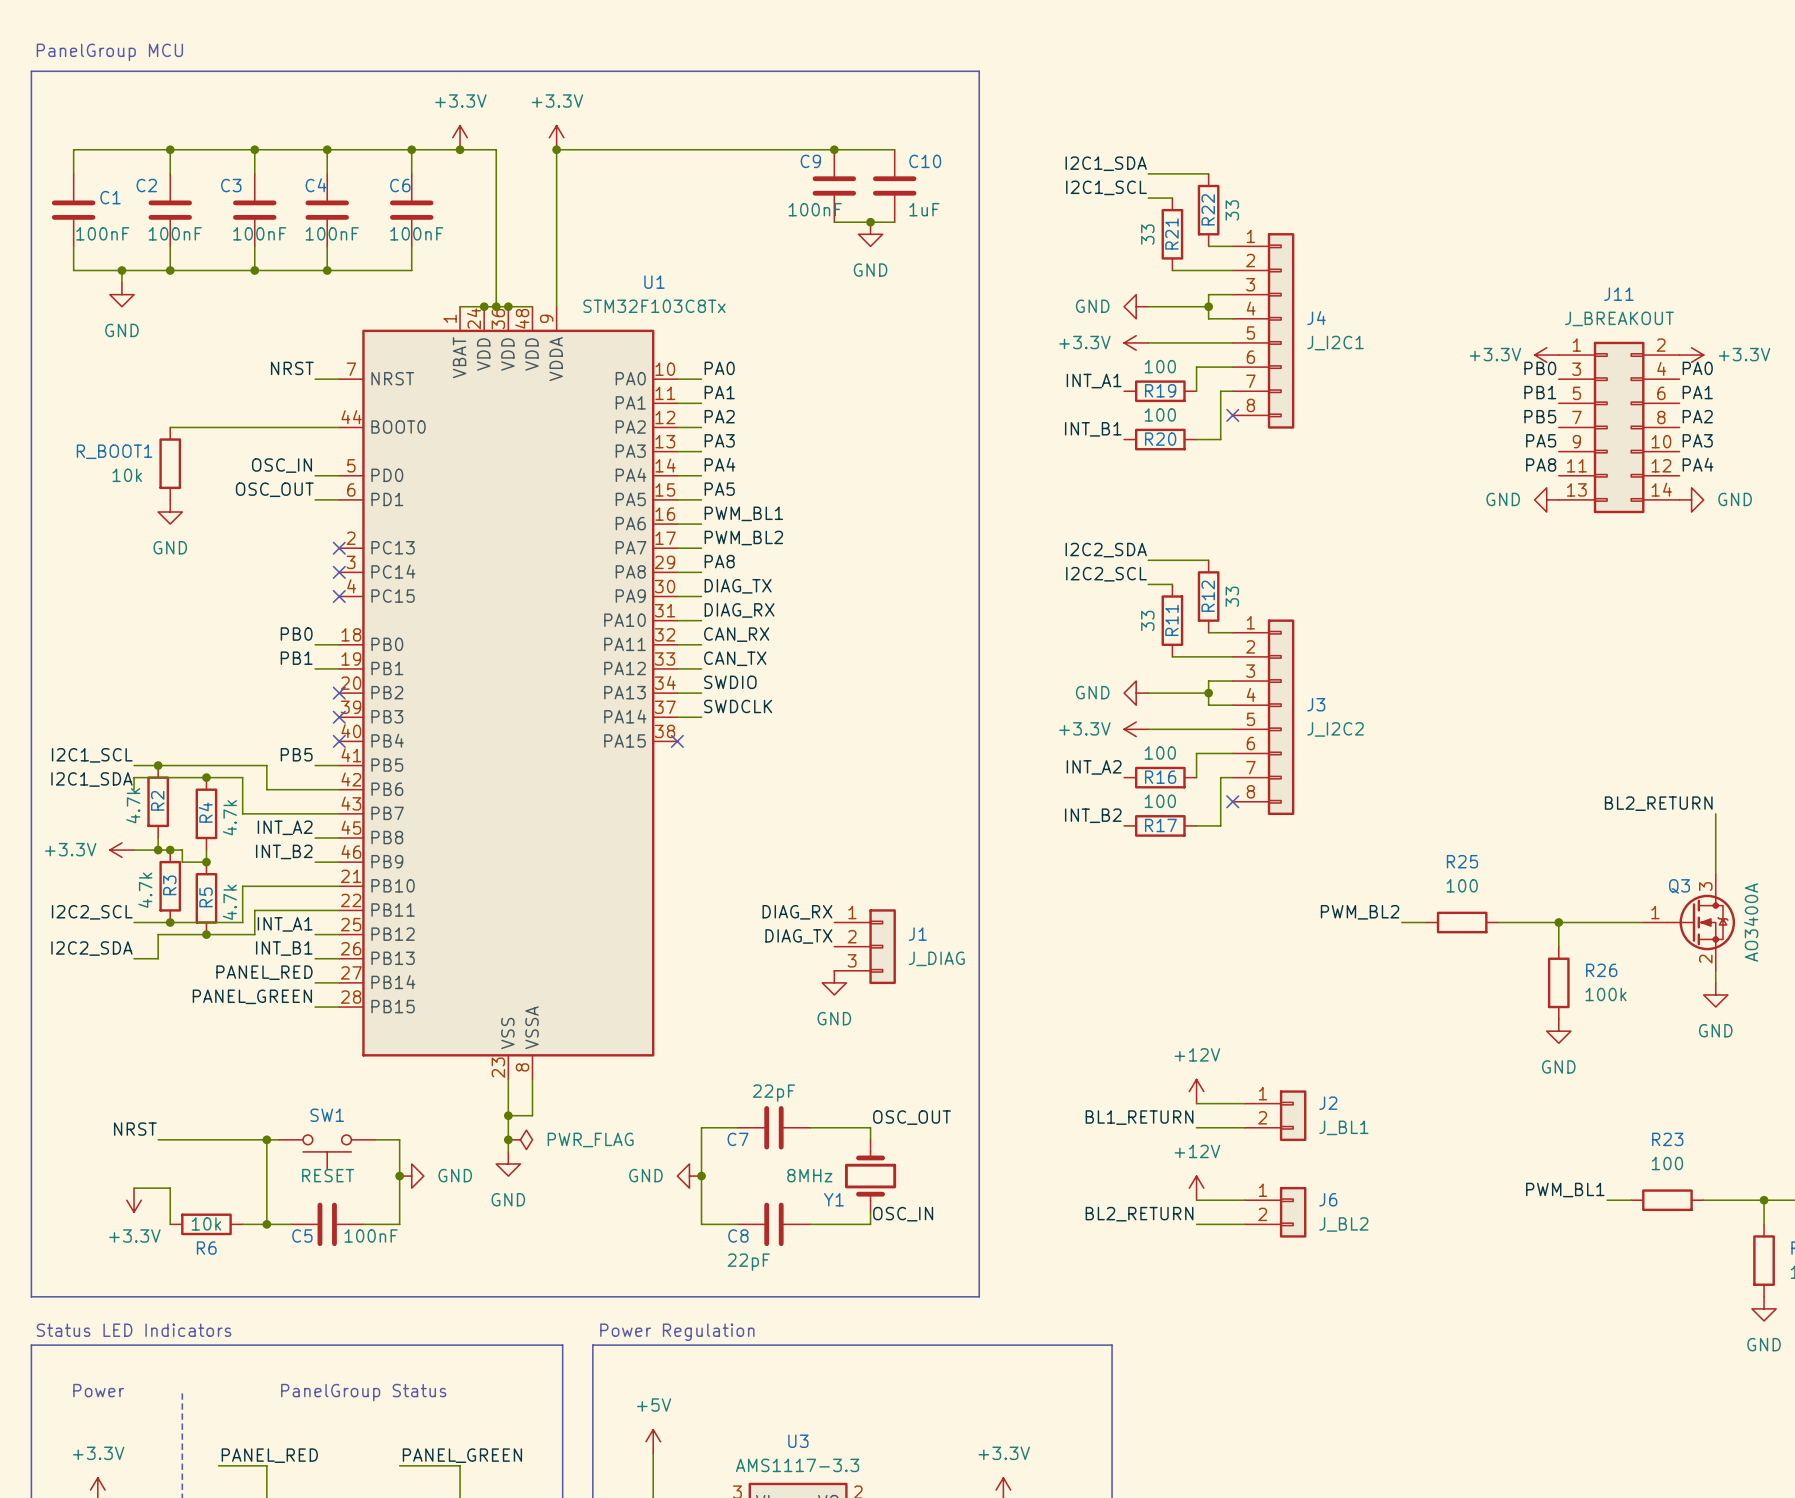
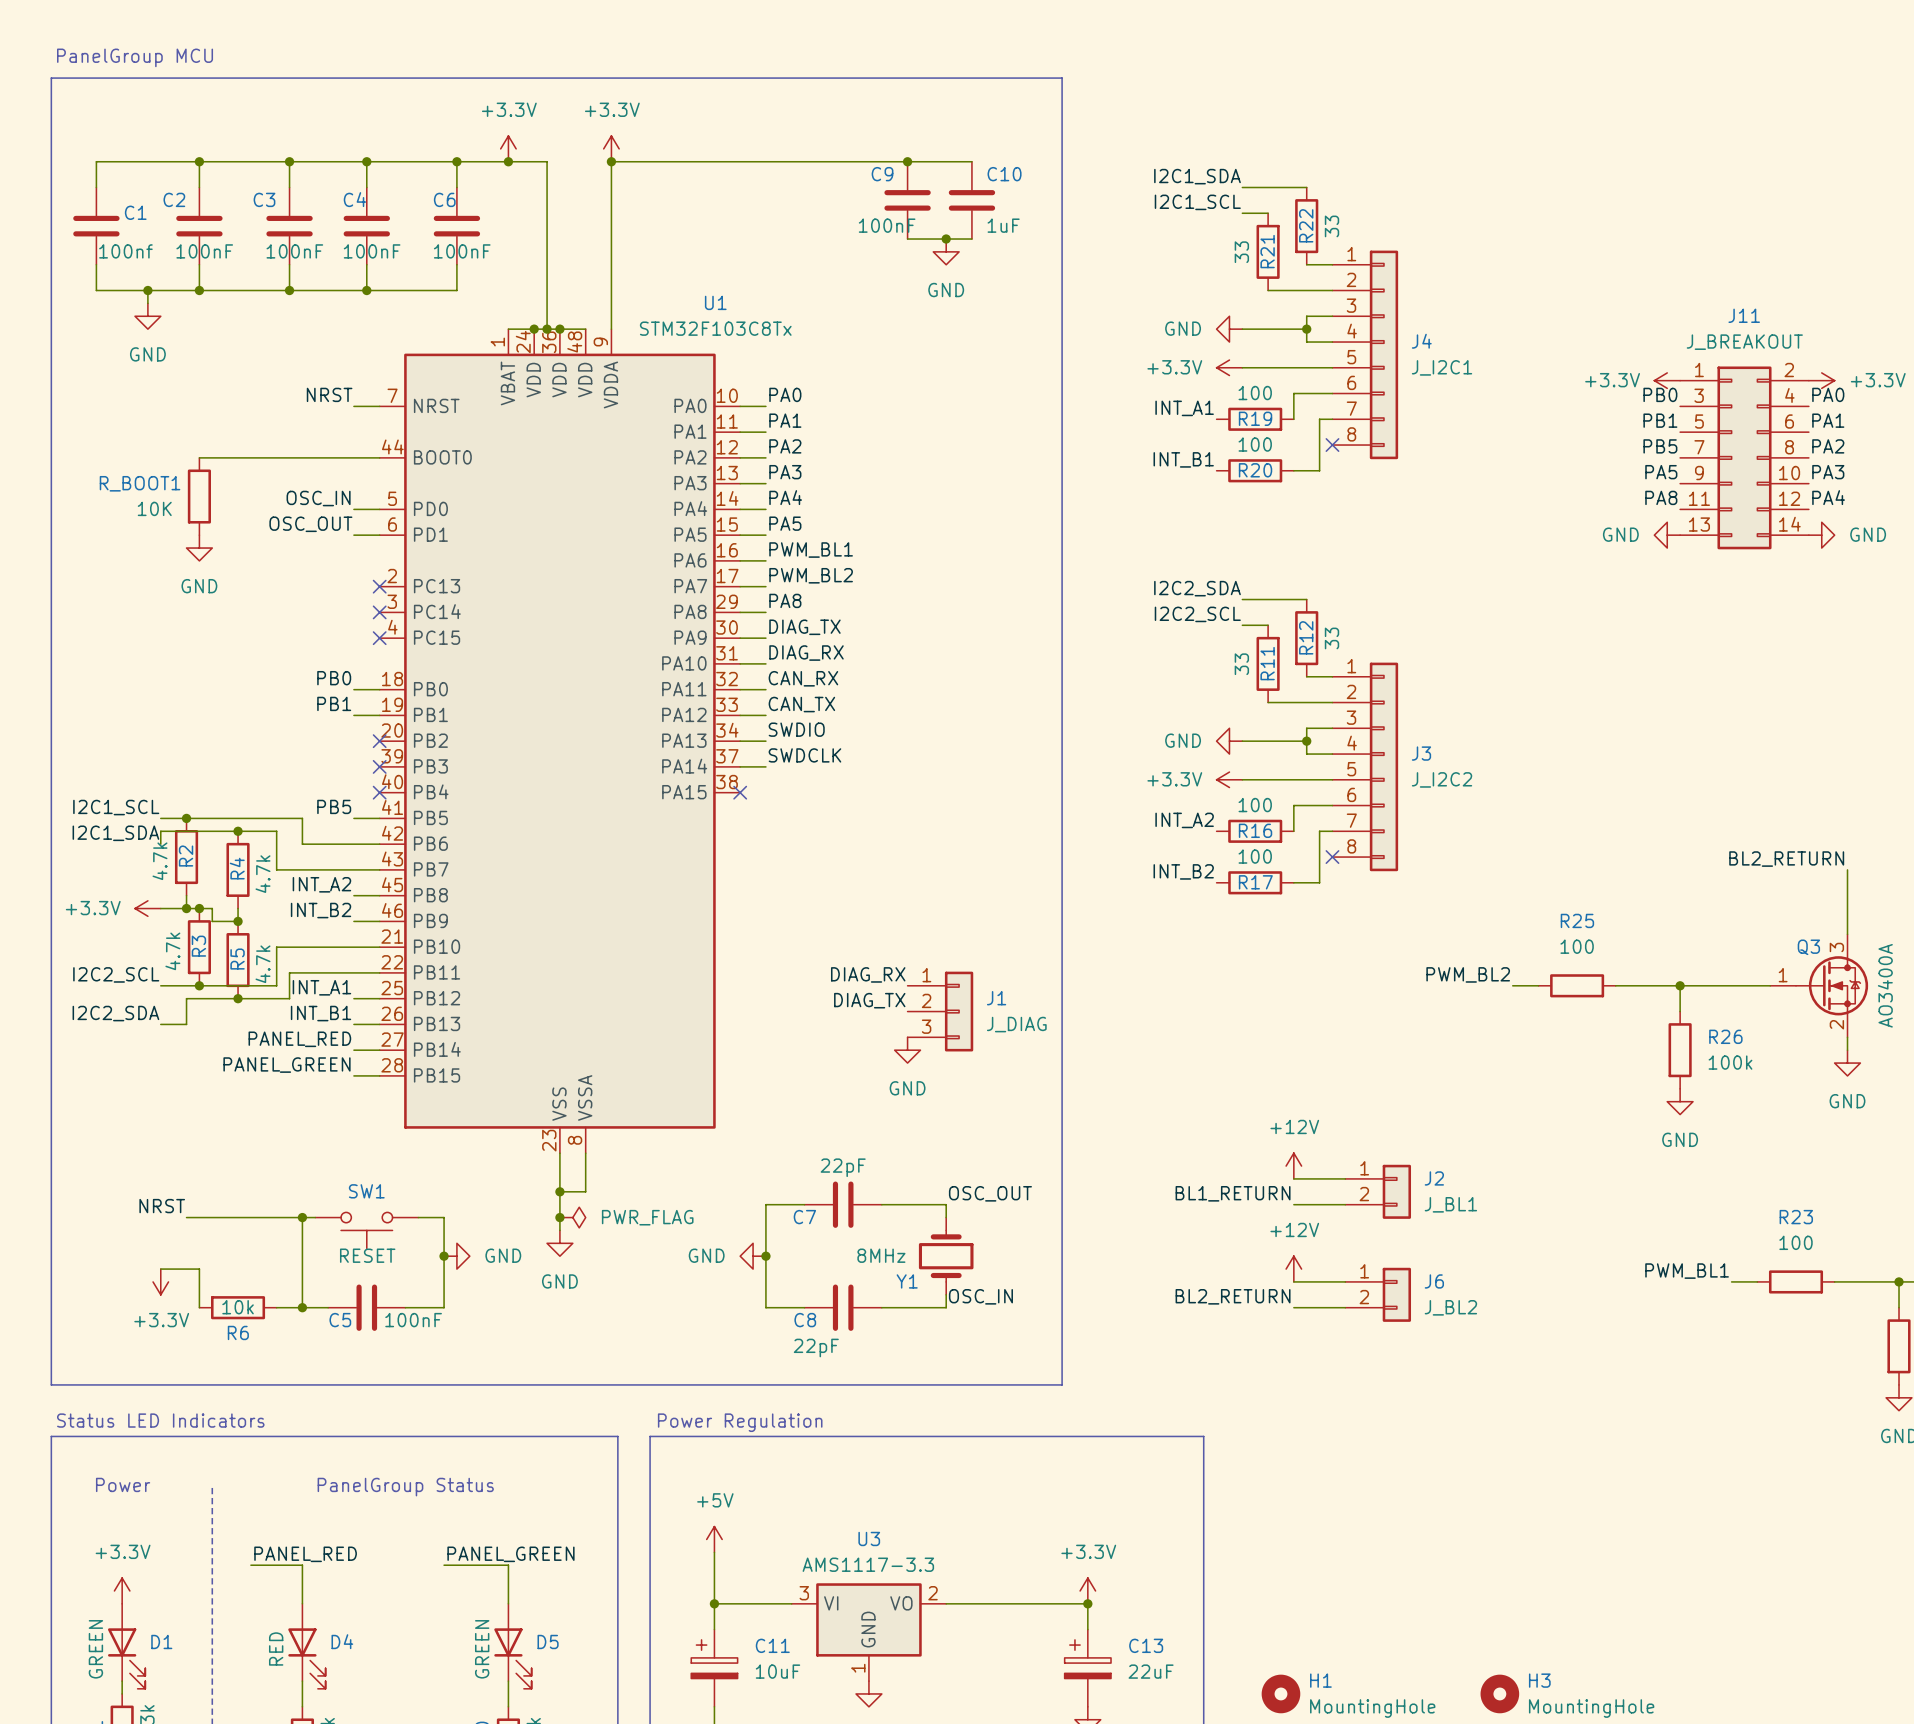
C1 value: 100nF (102, 233) -> 100nf (125, 251)
R_BOOT1 value: 10k (127, 475) -> 10K (154, 508)

